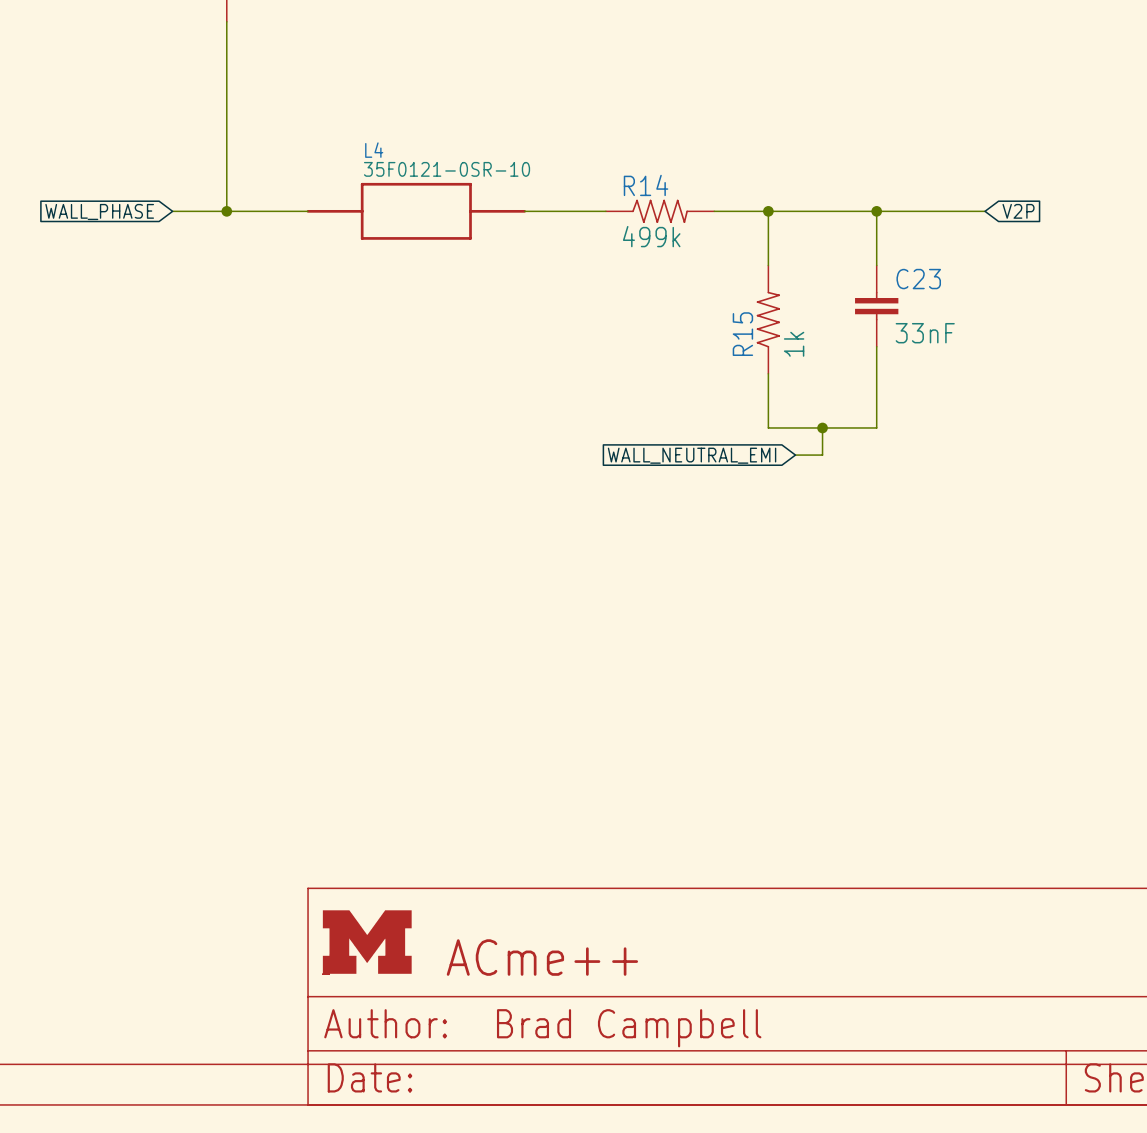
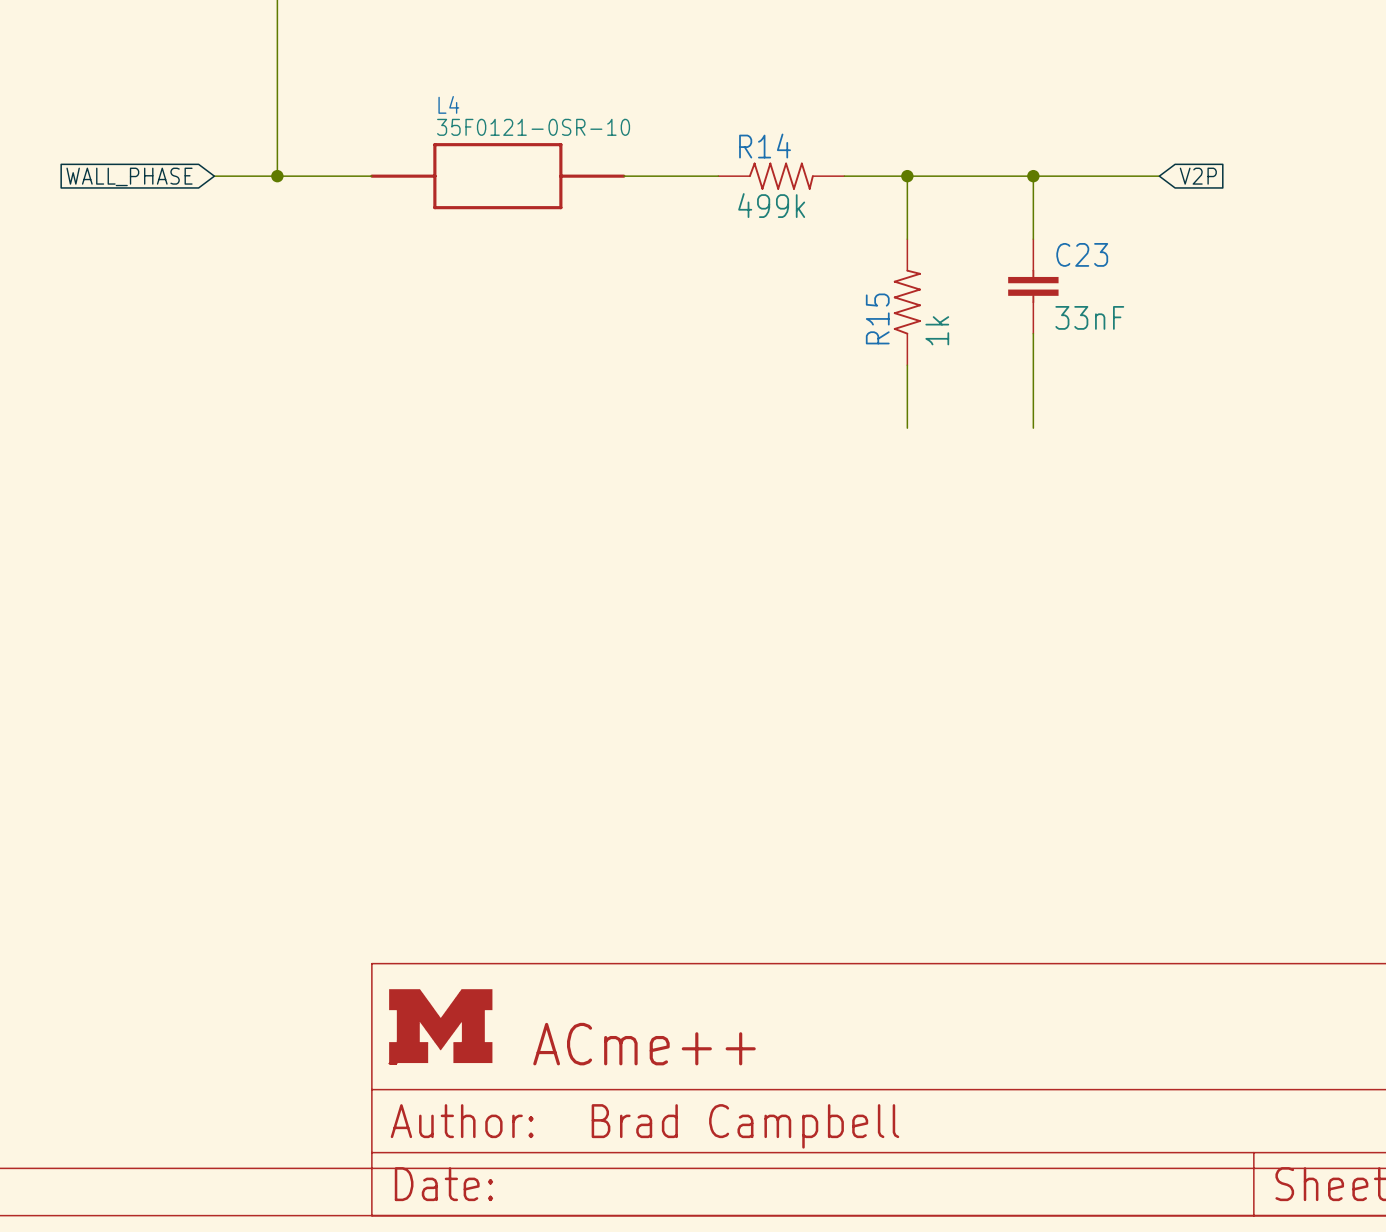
wire: (768, 427) (876, 427) -> none
wire: (822, 427) (822, 455) (795, 455) -> none
junction: (822, 427) -> none
global label: WALL_NEUTRAL_EMI (692, 455) -> none

